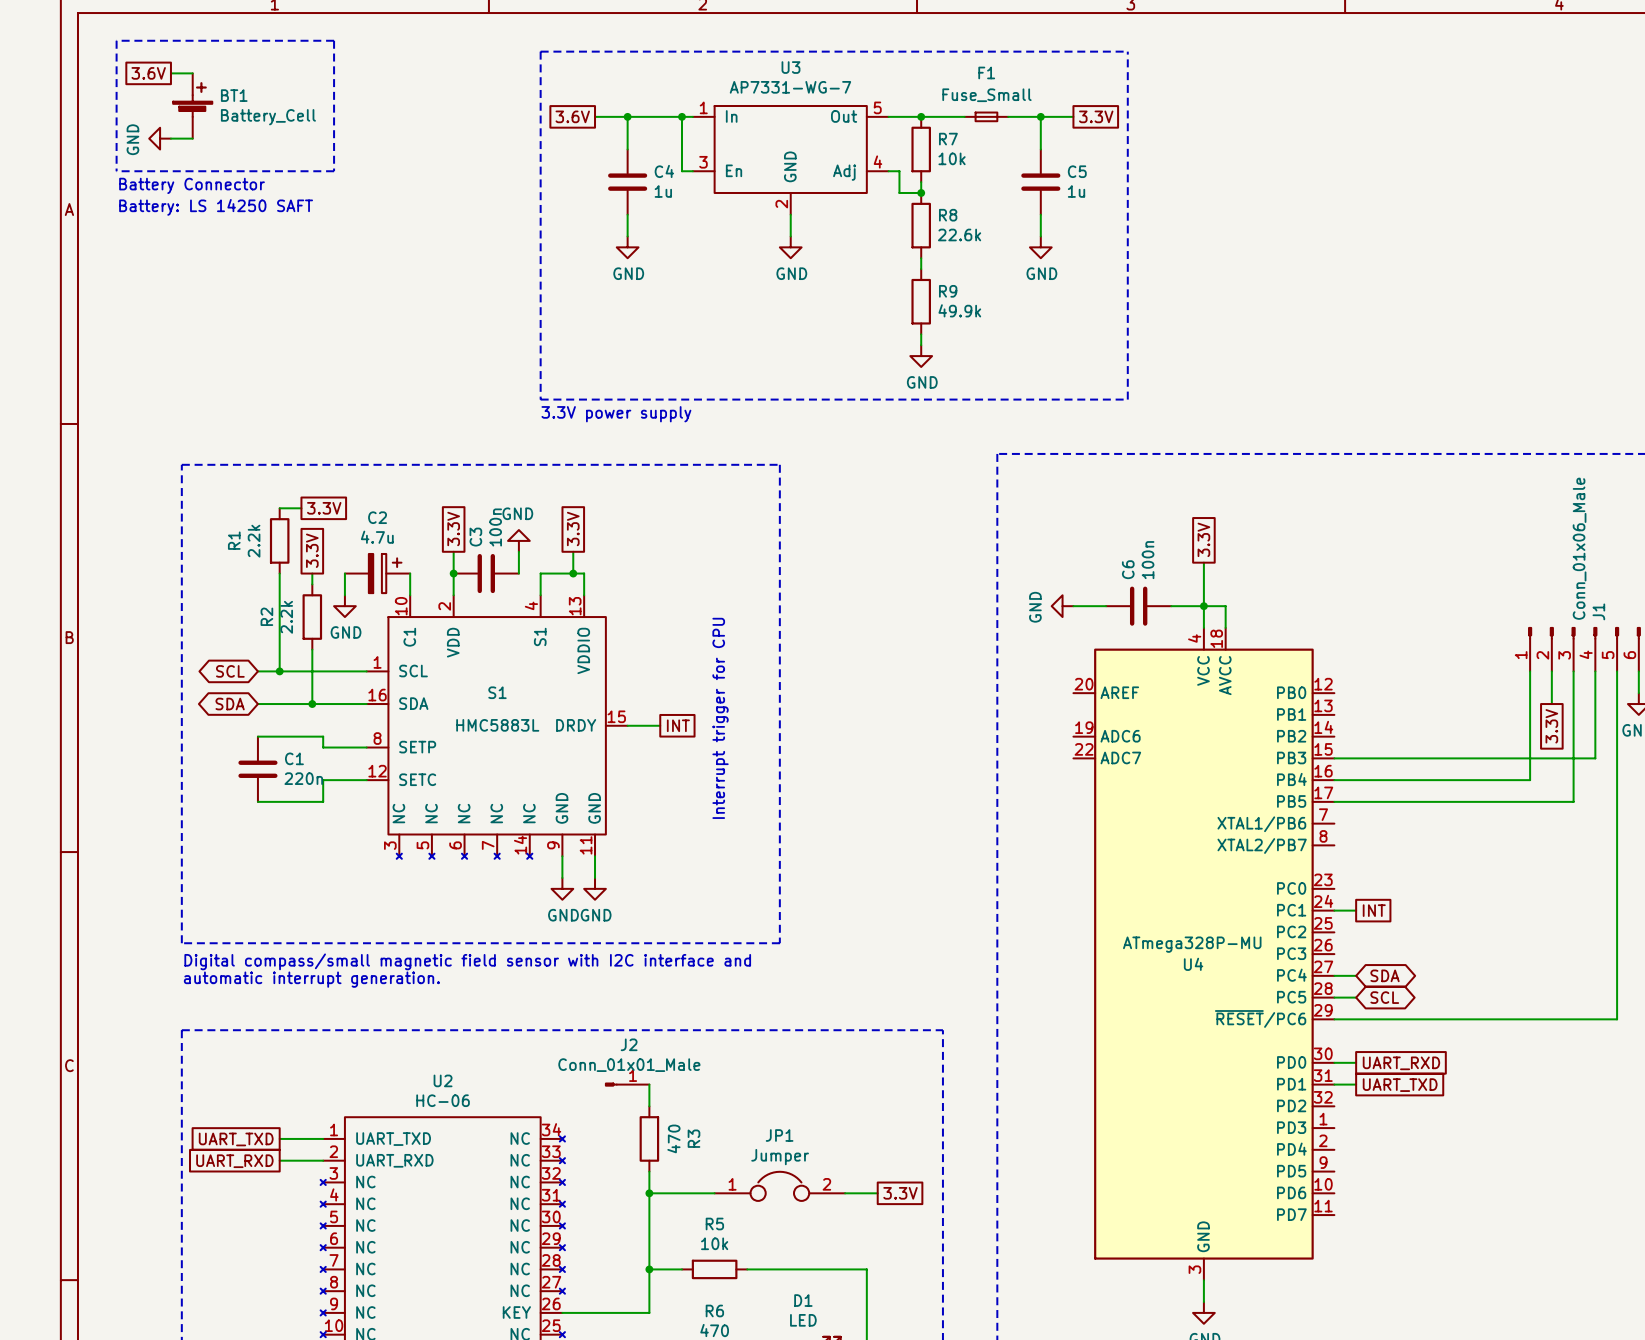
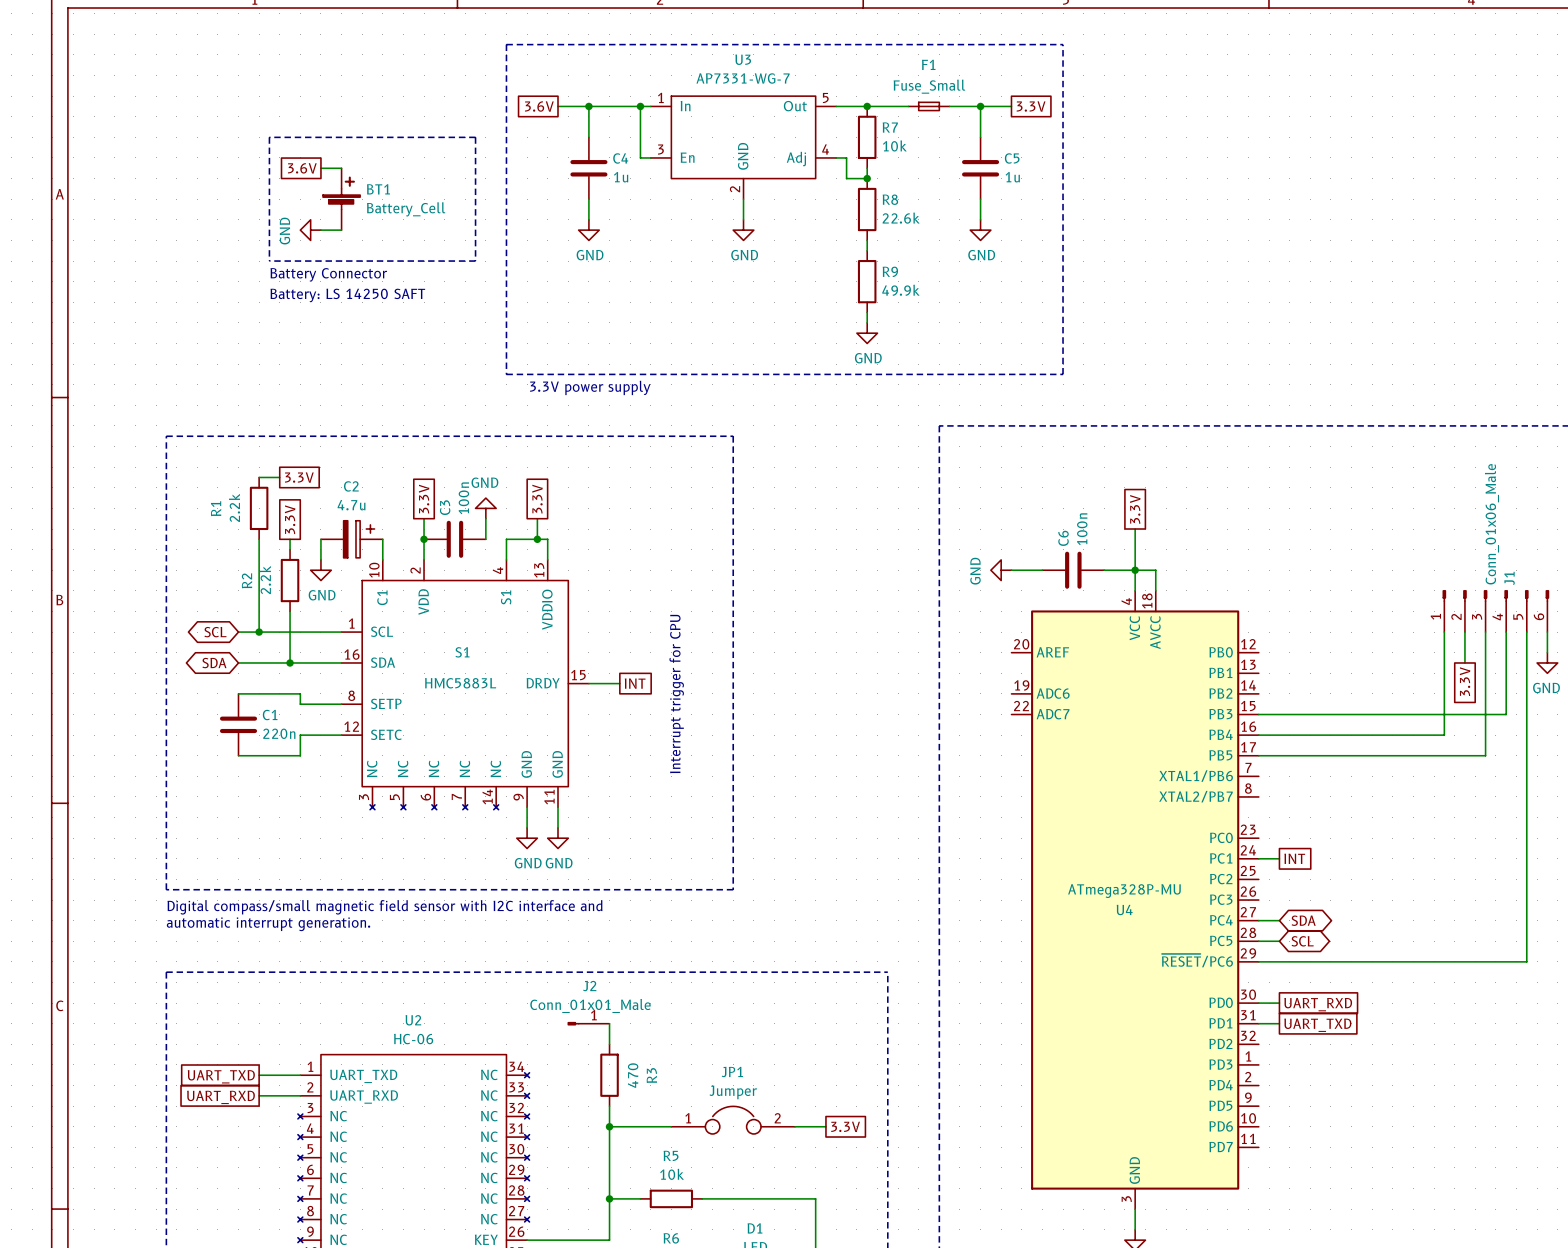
line: (116, 40) (334, 40) (334, 171) (116, 171) (116, 40) -> (269, 137) (475, 137) (475, 261) (269, 261) (269, 137)
global label position: 3.6V (148, 73) -> 3.6V (302, 168)
wire: (170, 73) (192, 73) -> none
BT1 position: (192, 106) -> (341, 199)
power symbol position: GND (160, 138) -> GND (310, 230)
wire: (170, 138) (192, 138) -> (320, 168) (341, 168)
text position: Battery Connector (192, 185) -> Battery Connector (328, 274)
text position: Battery: LS 14250 SAFT (216, 207) -> Battery: LS 14250 SAFT (347, 295)
wire: none -> (320, 230) (341, 230)

